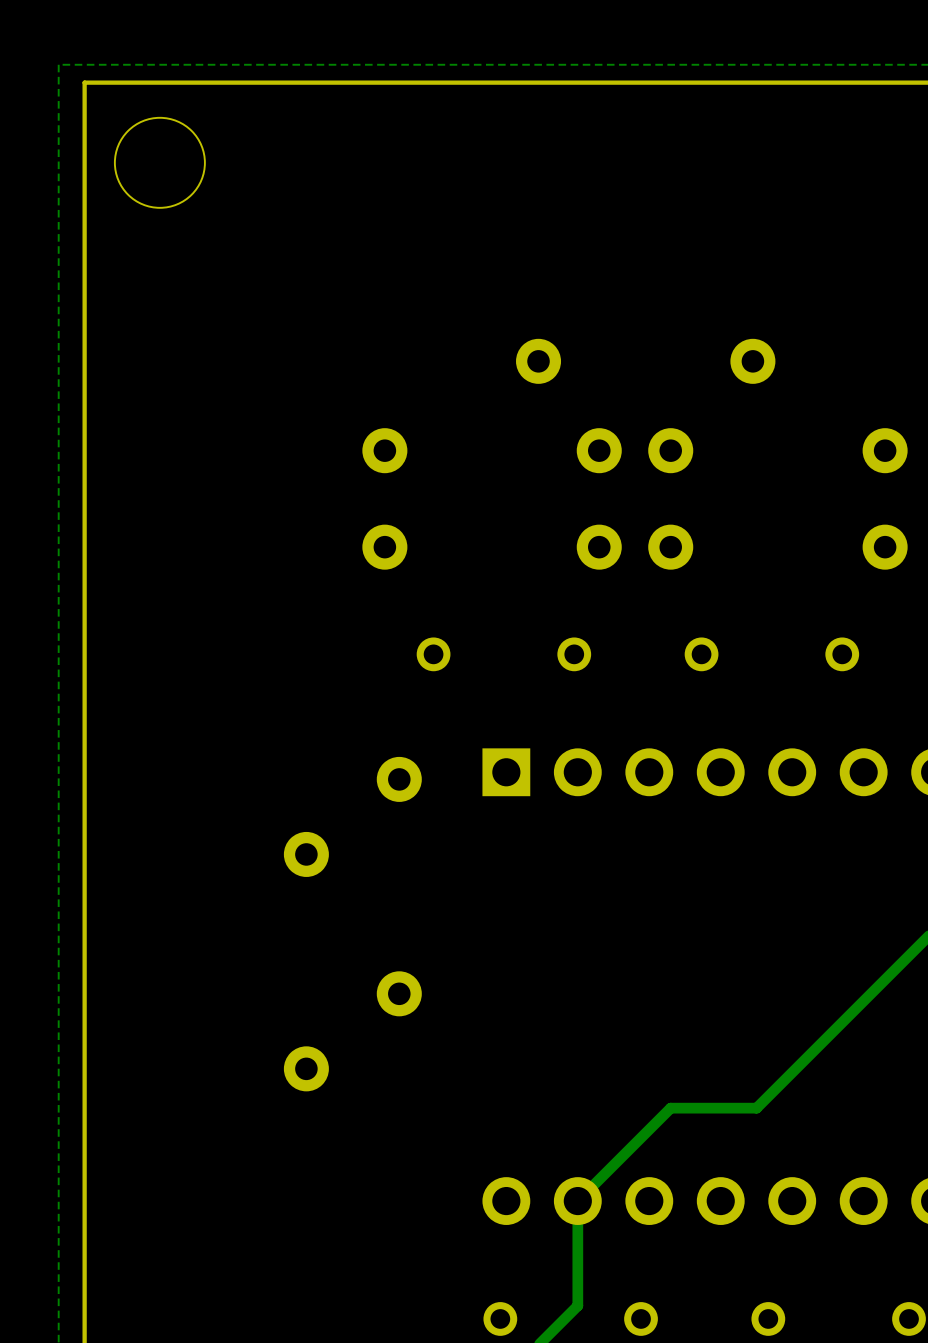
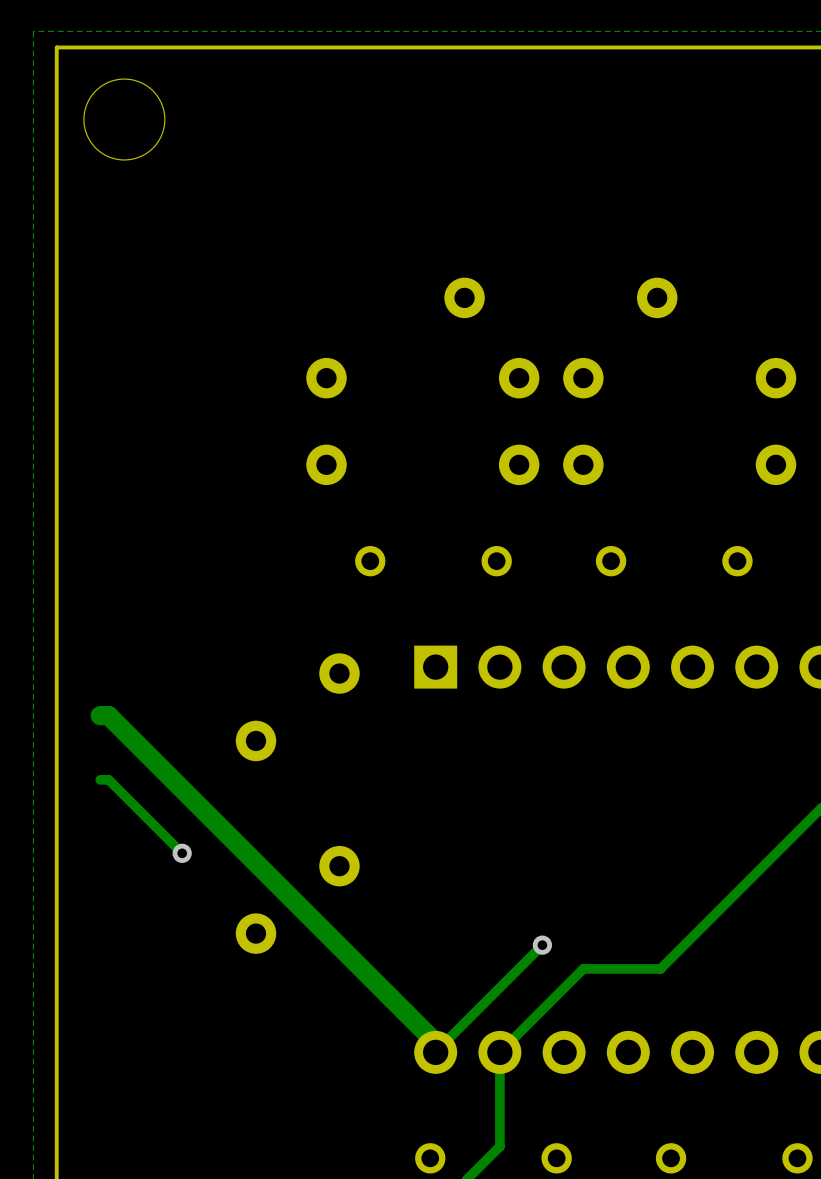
track: none -> (100, 715) (108, 715) (435, 1042) (435, 1052) (542, 945)
track: none -> (100, 779) (108, 779) (182, 853)
via: none -> (182, 853)
via: none -> (542, 945)

